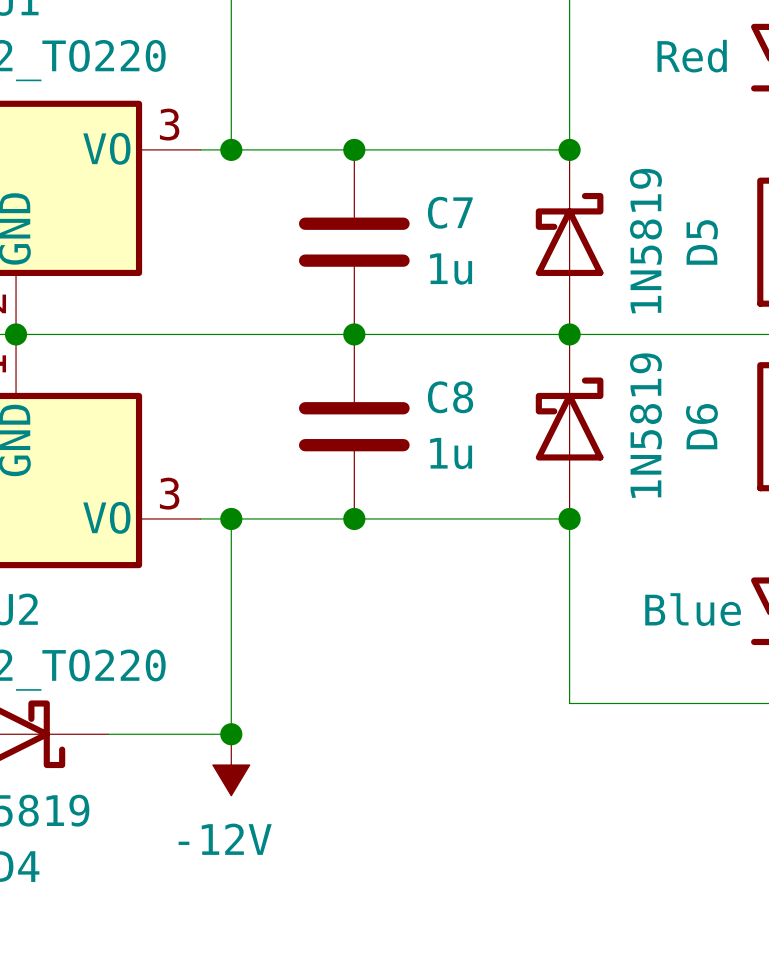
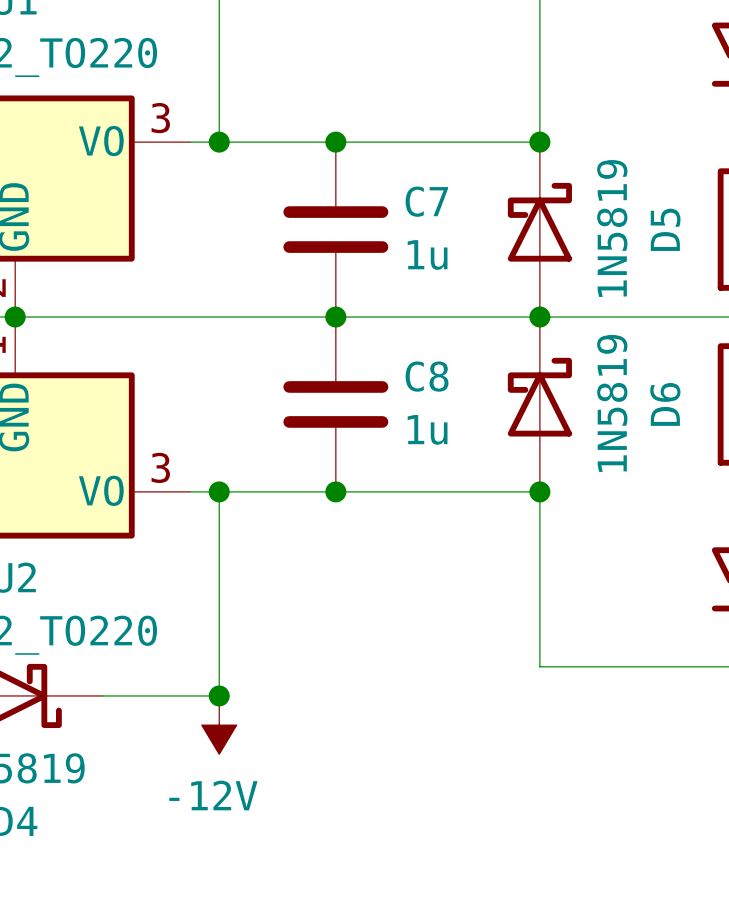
part text: Red (692, 56) -> none
part text: Blue (693, 609) -> none

